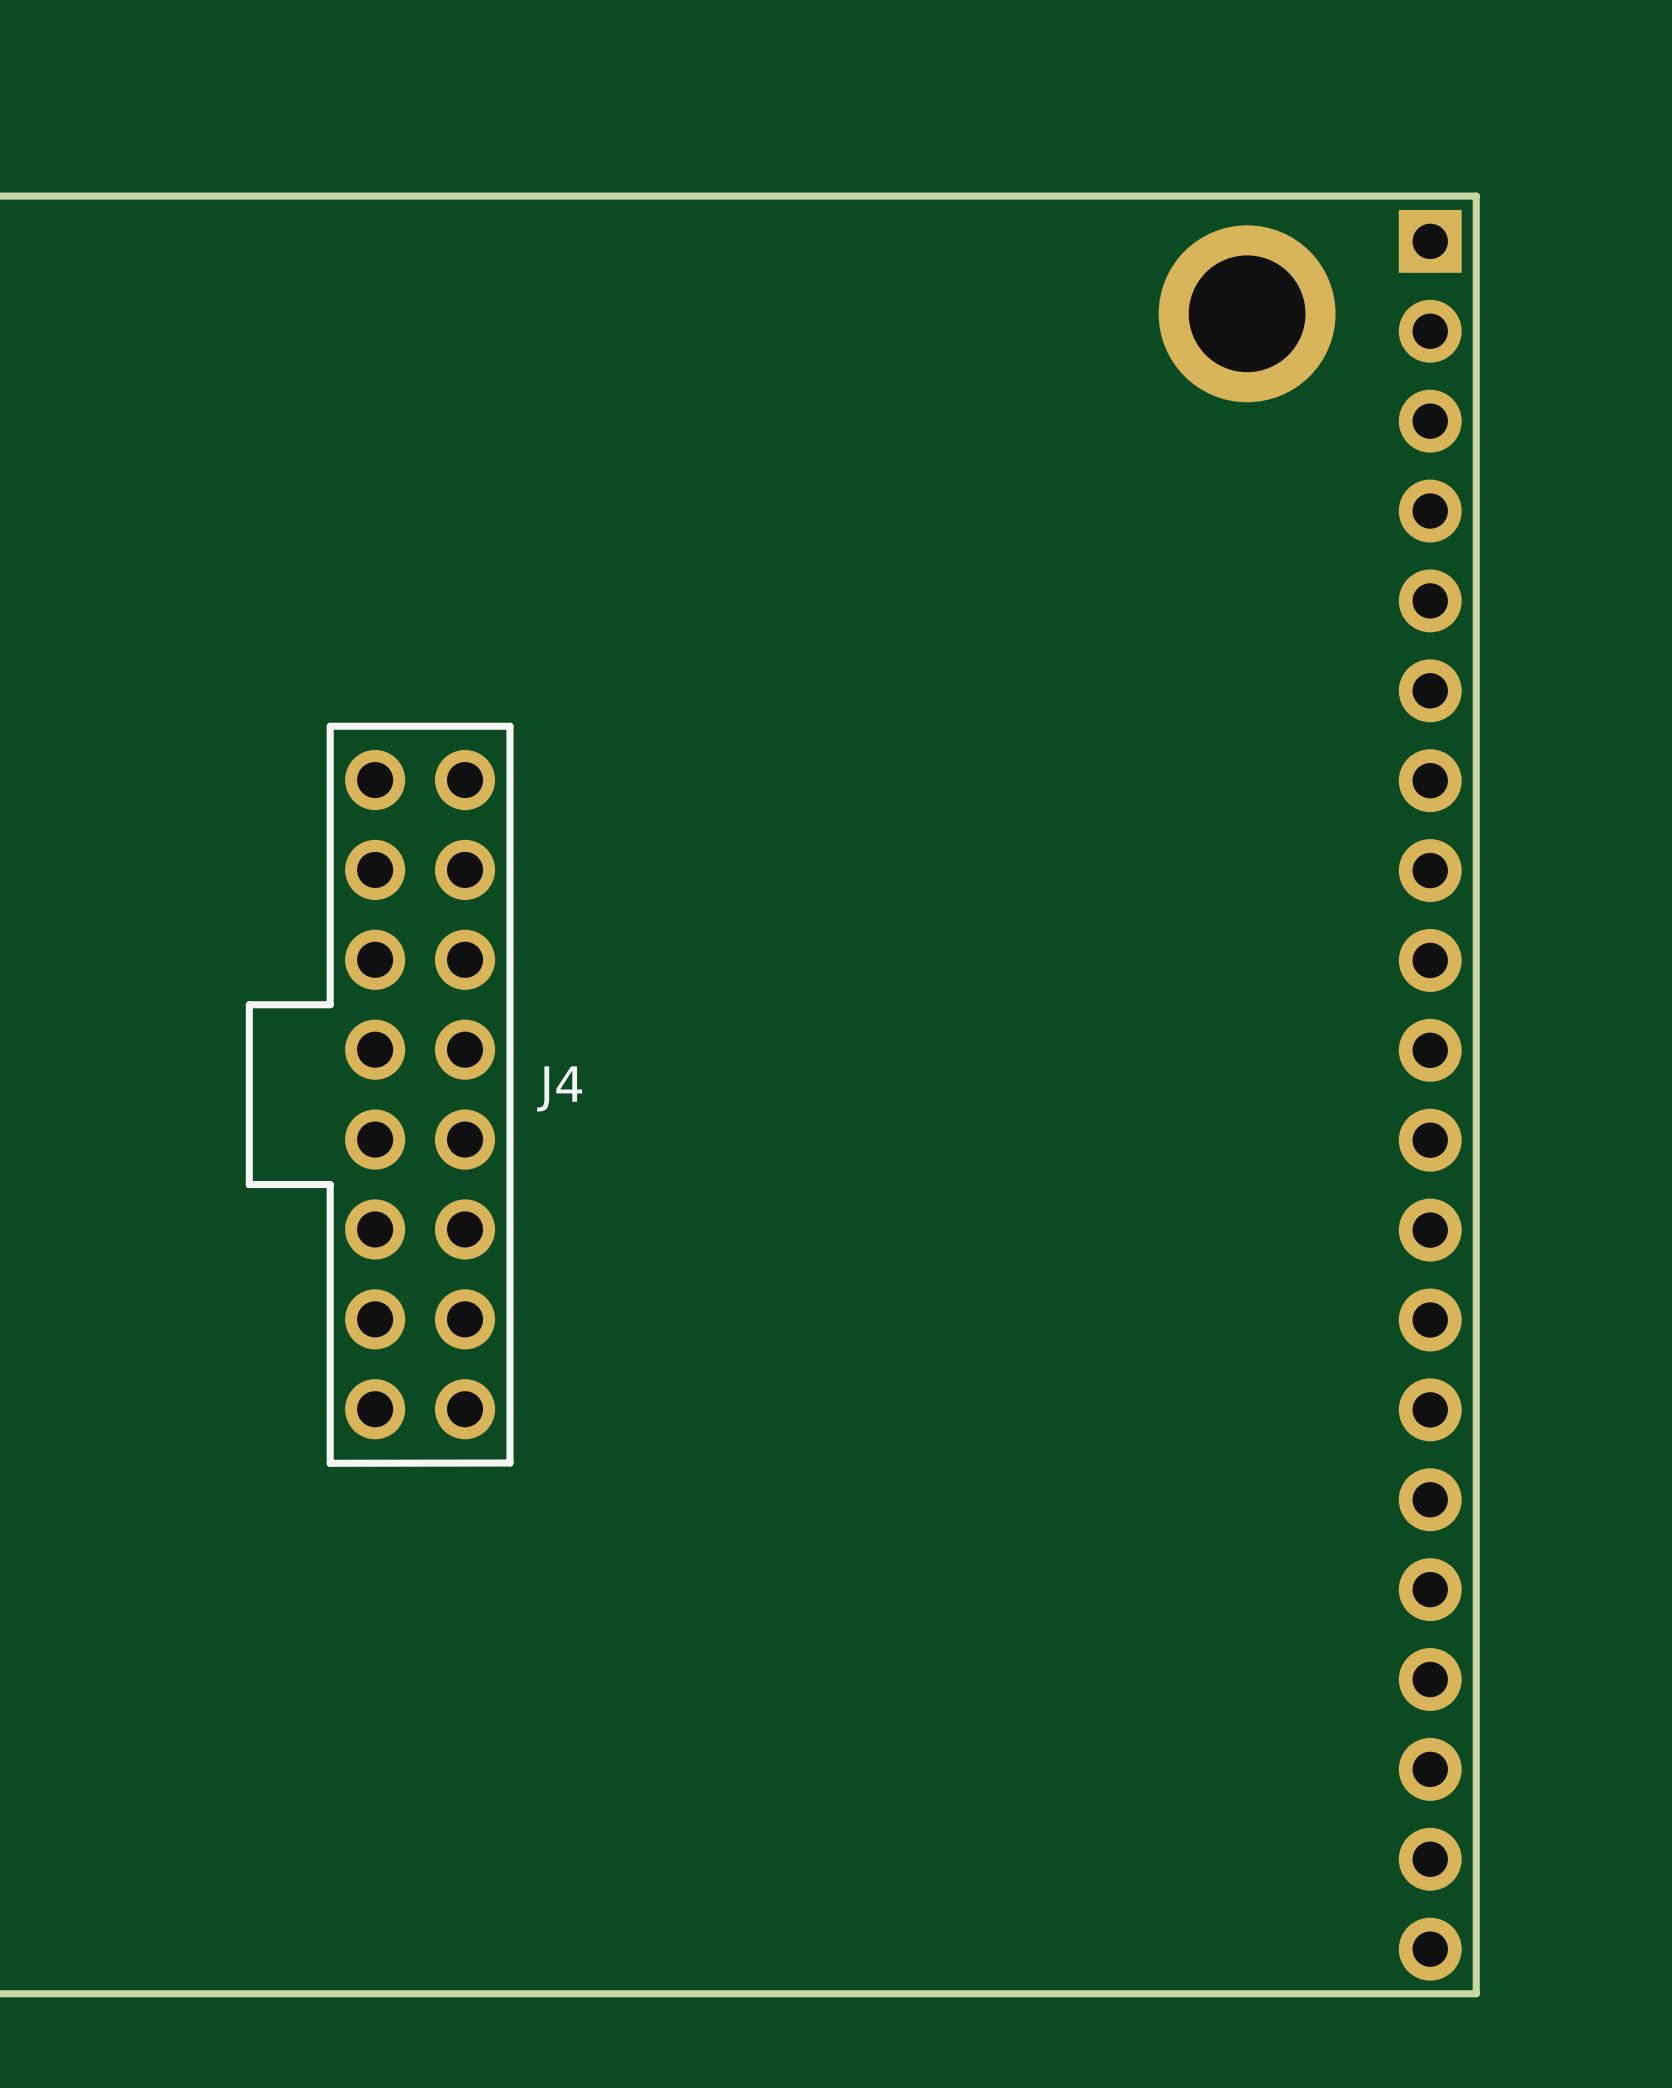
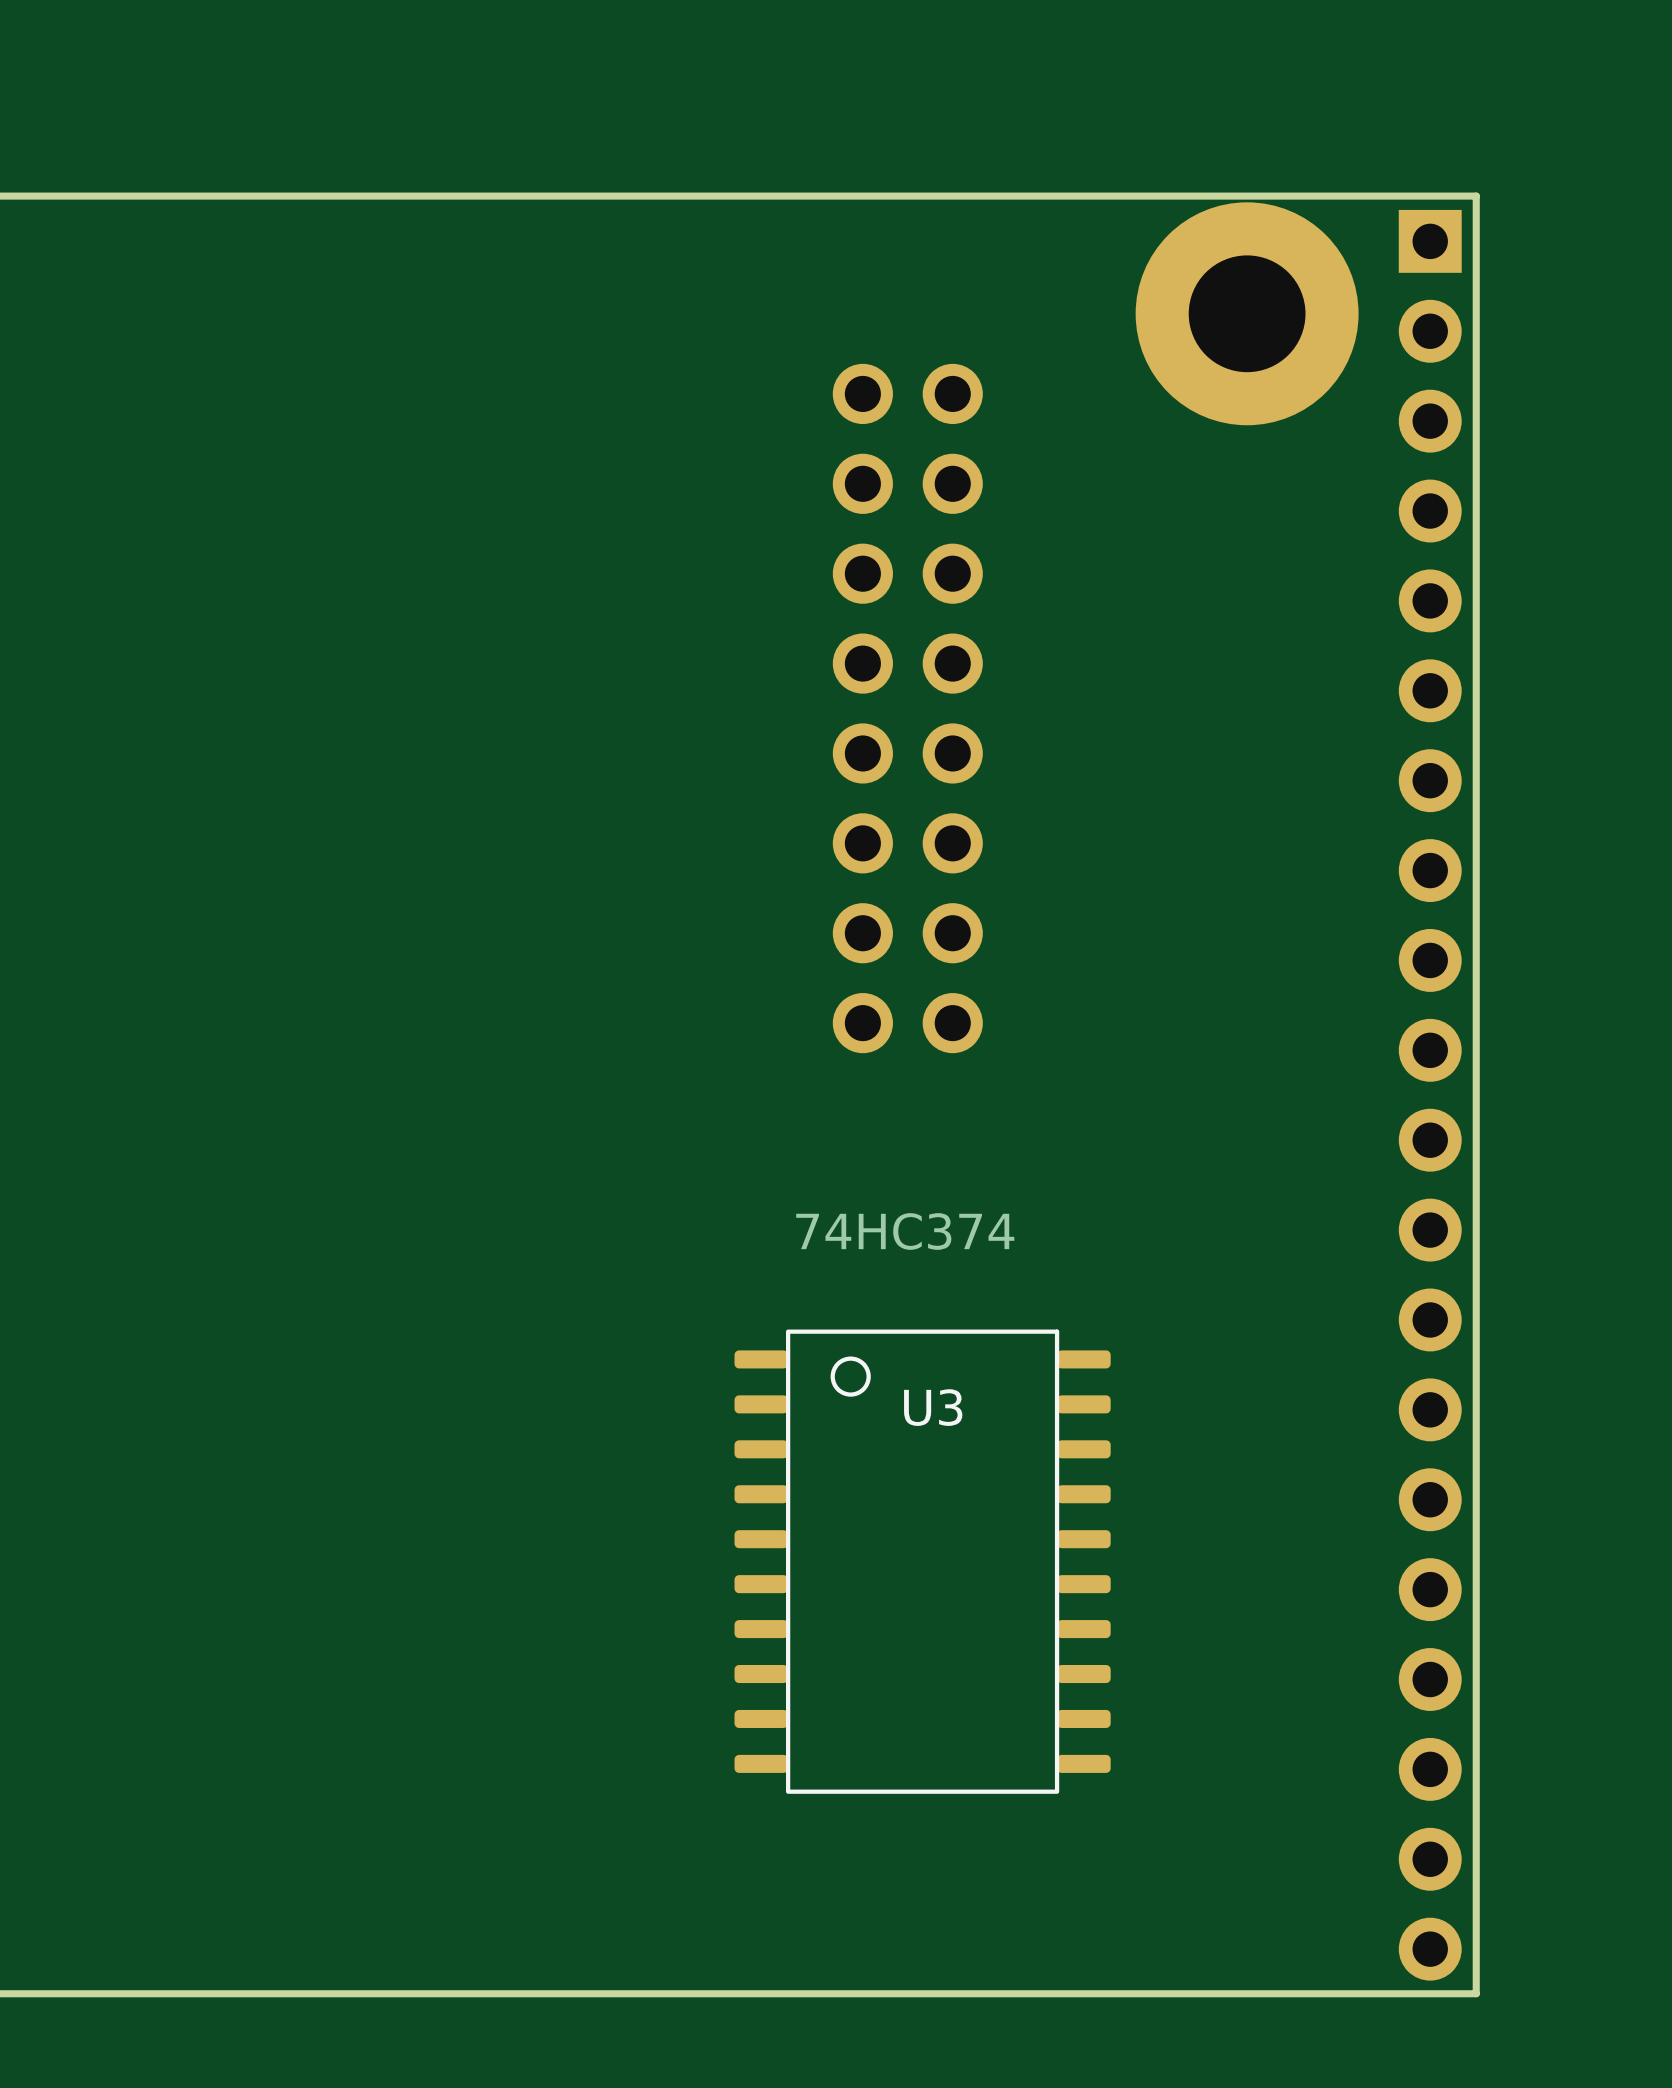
part footprint: [1158, 225, 1336, 403] -> [1135, 202, 1359, 426]
J4 side: bottom (379, 1094) -> top (907, 708)
U3: none -> 74HC374 (922, 1561)

